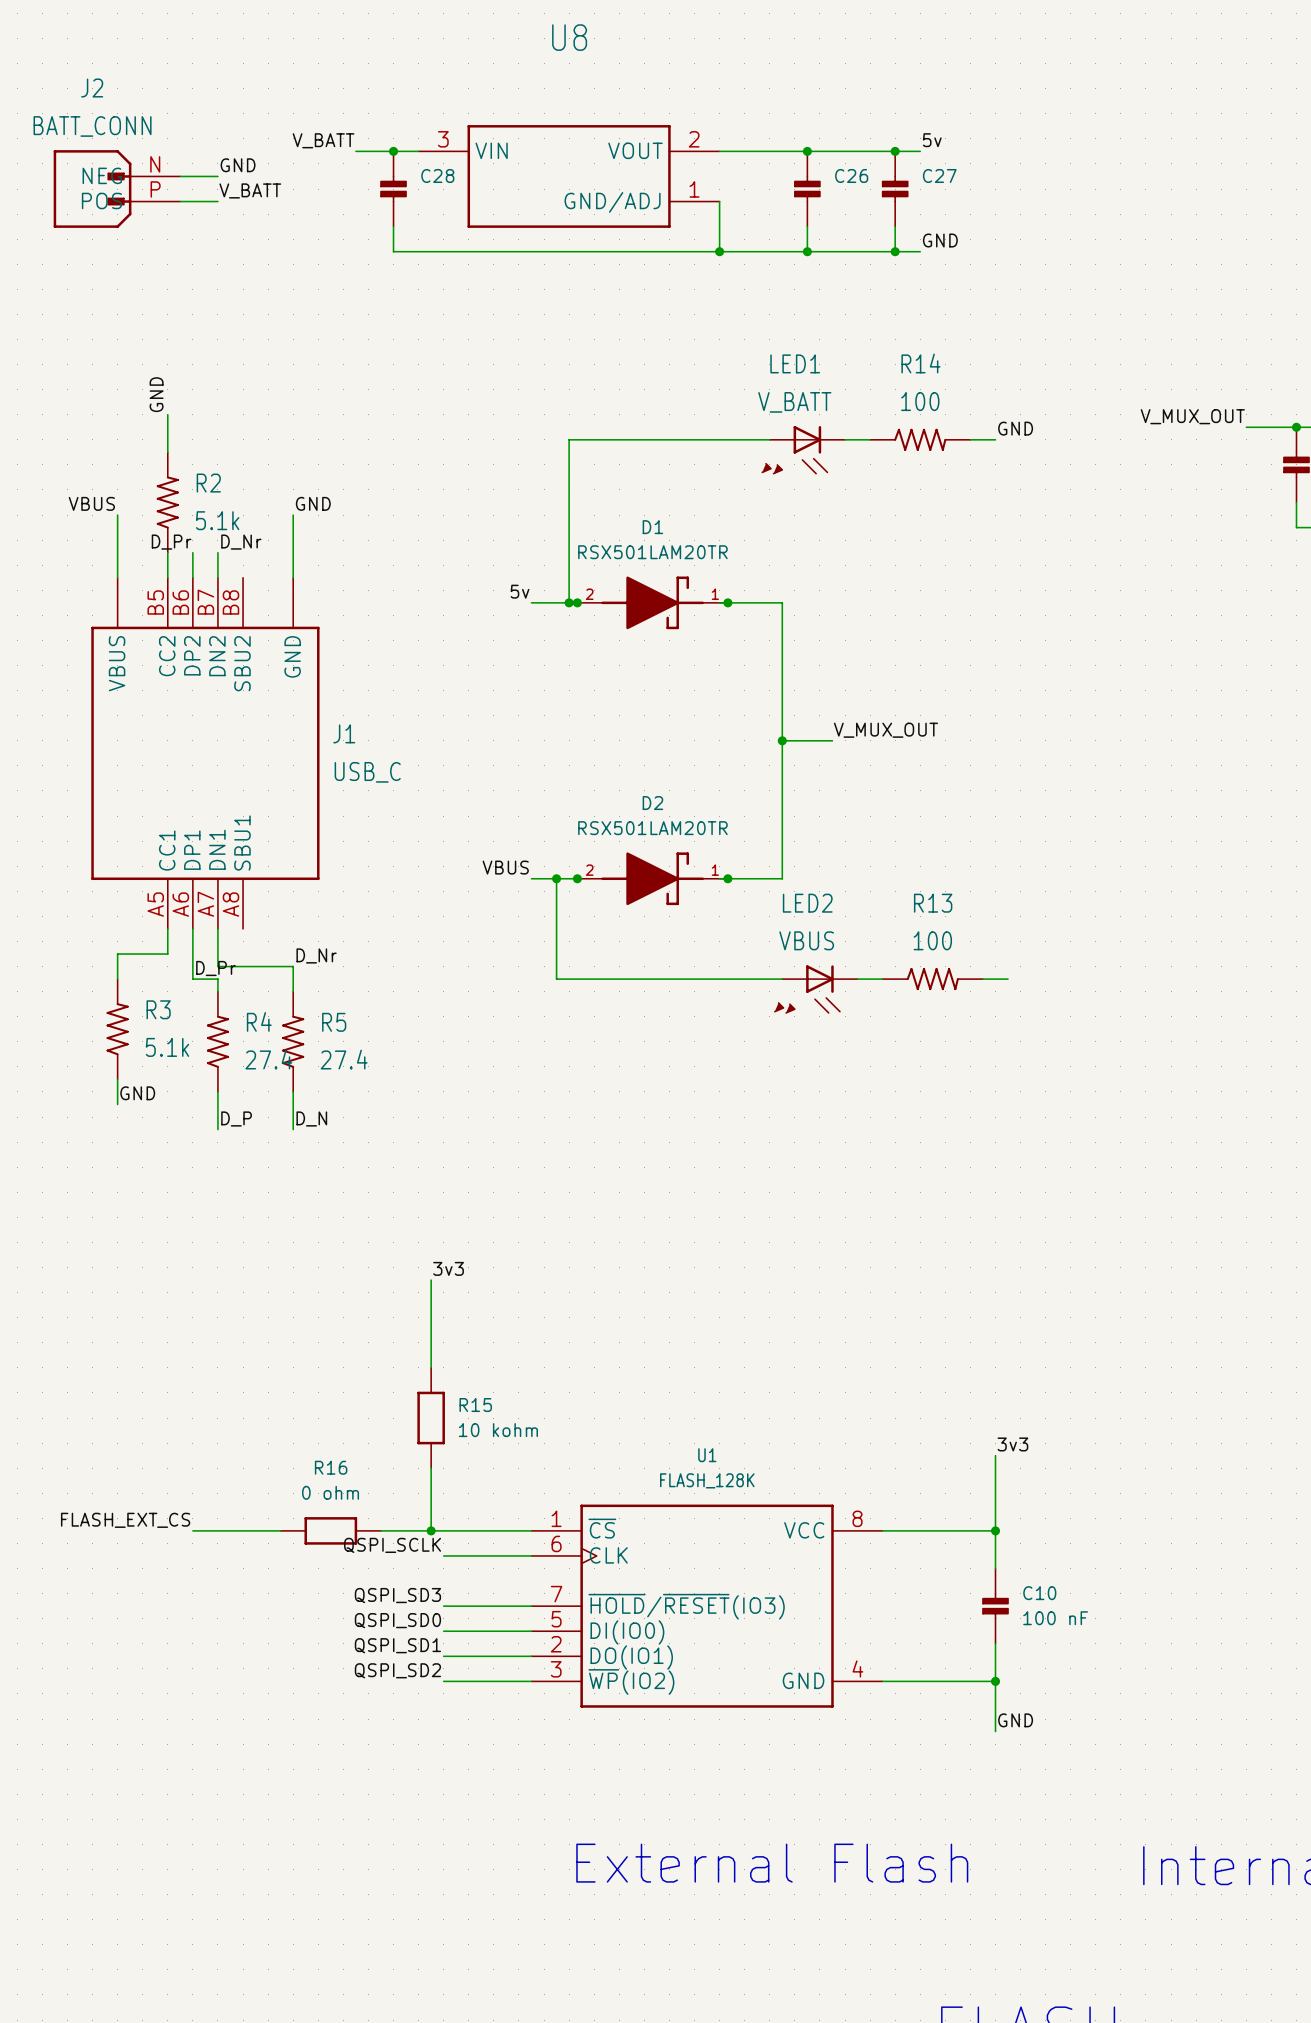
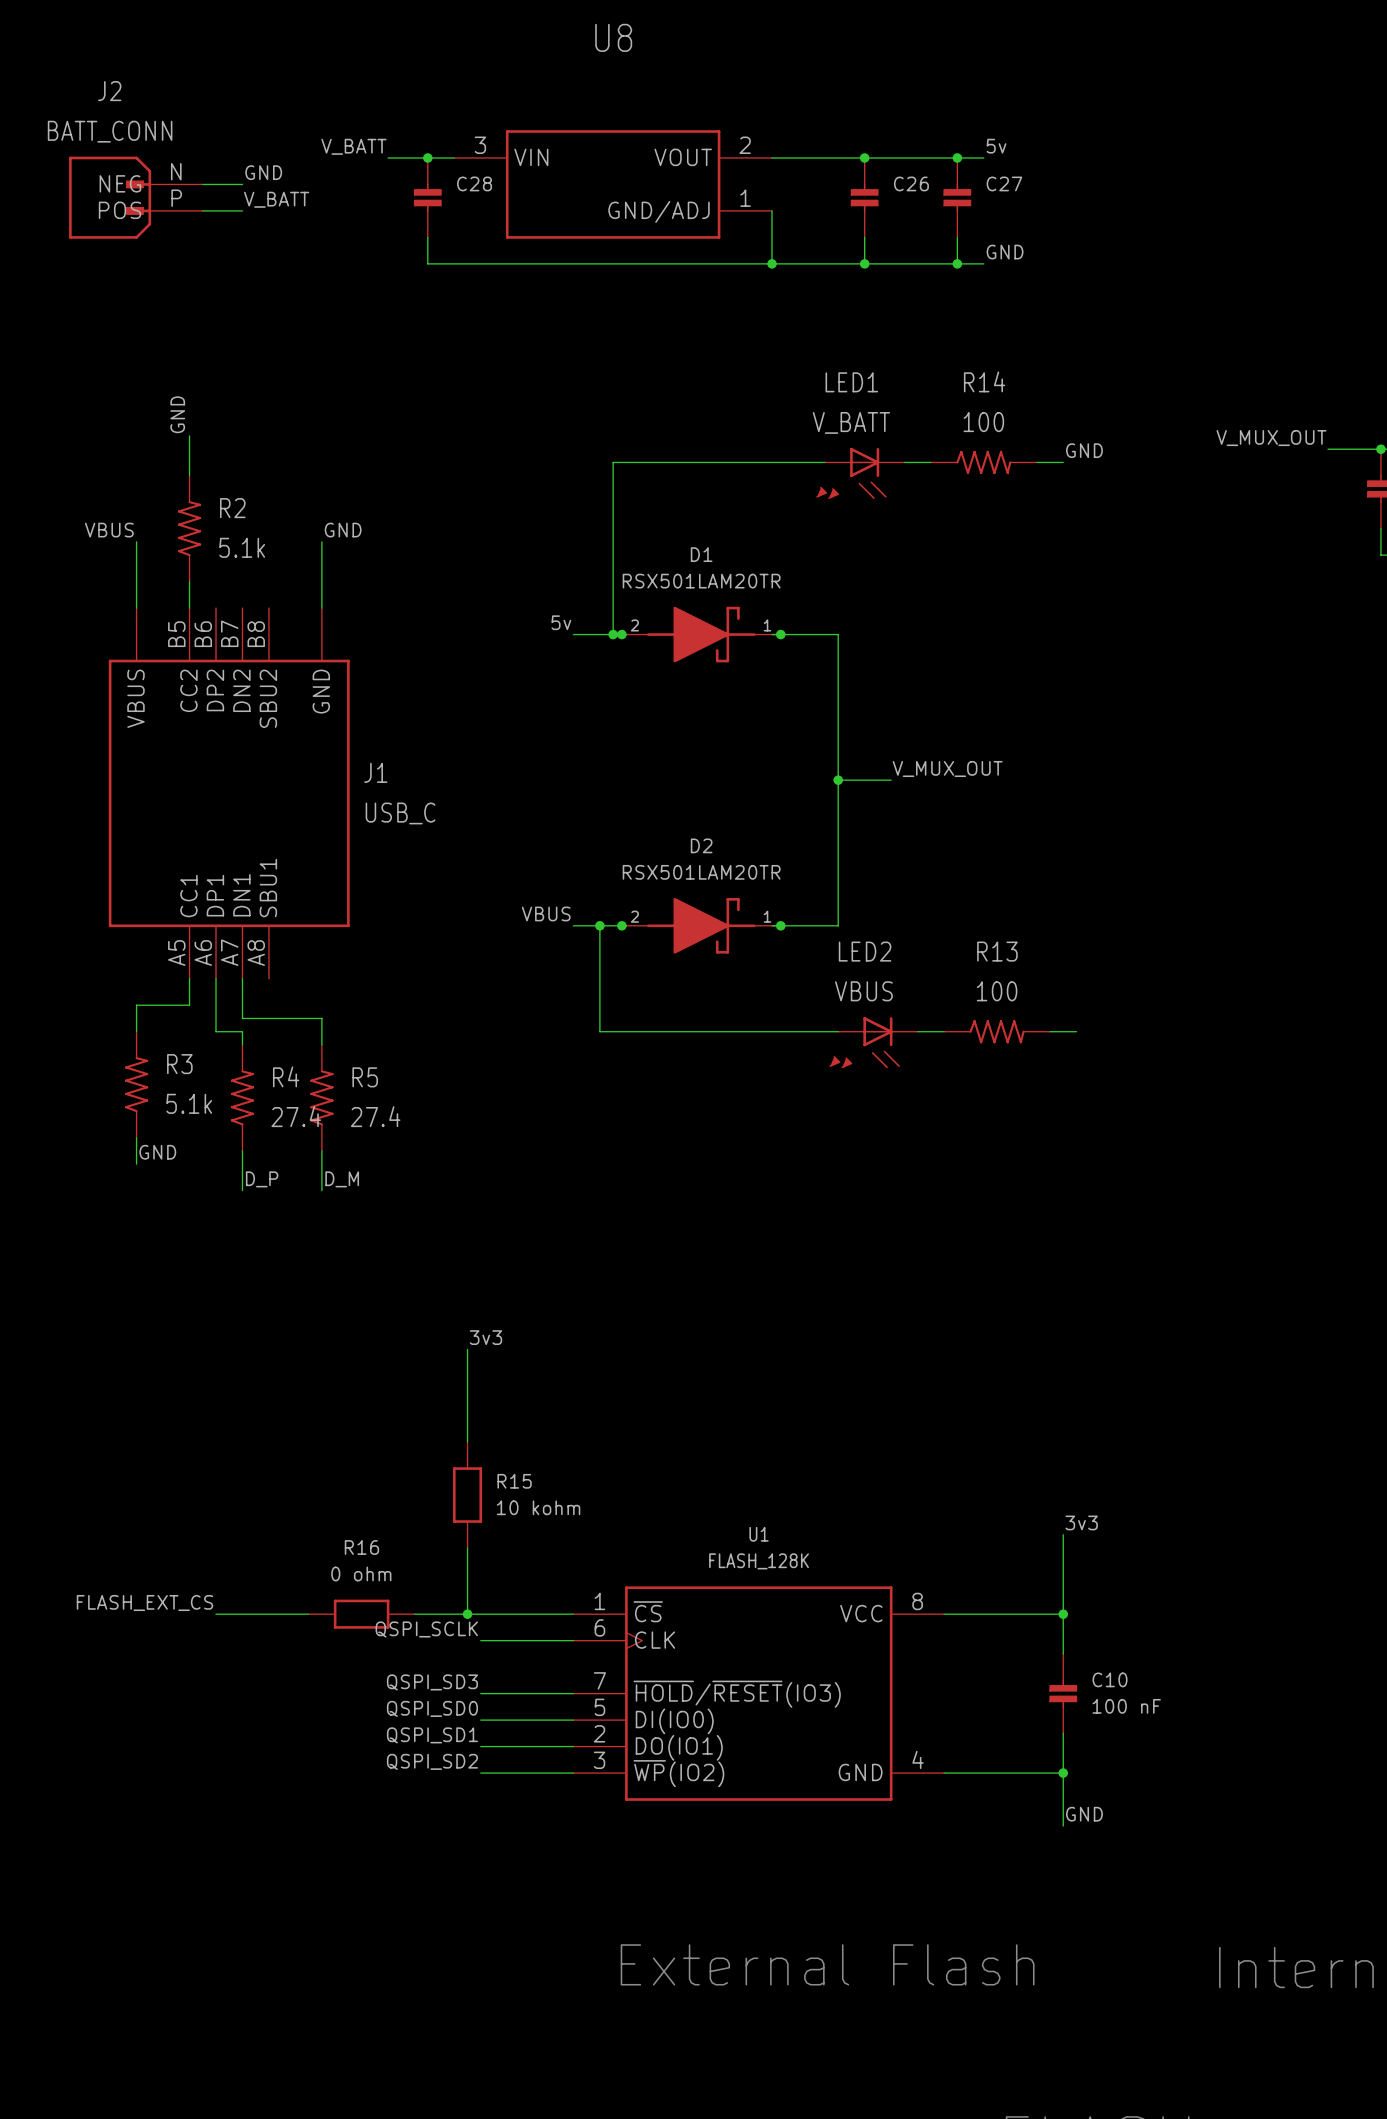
label: D_Pr (171, 542) -> none
label: D_Nr (241, 542) -> none
wire: (192, 552) (192, 577) -> none
wire: (217, 552) (217, 577) -> none
label: D_Nr (316, 955) -> none
label: D_Pr (215, 968) -> none
label: D_N (311, 1118) -> D_M (342, 1179)

